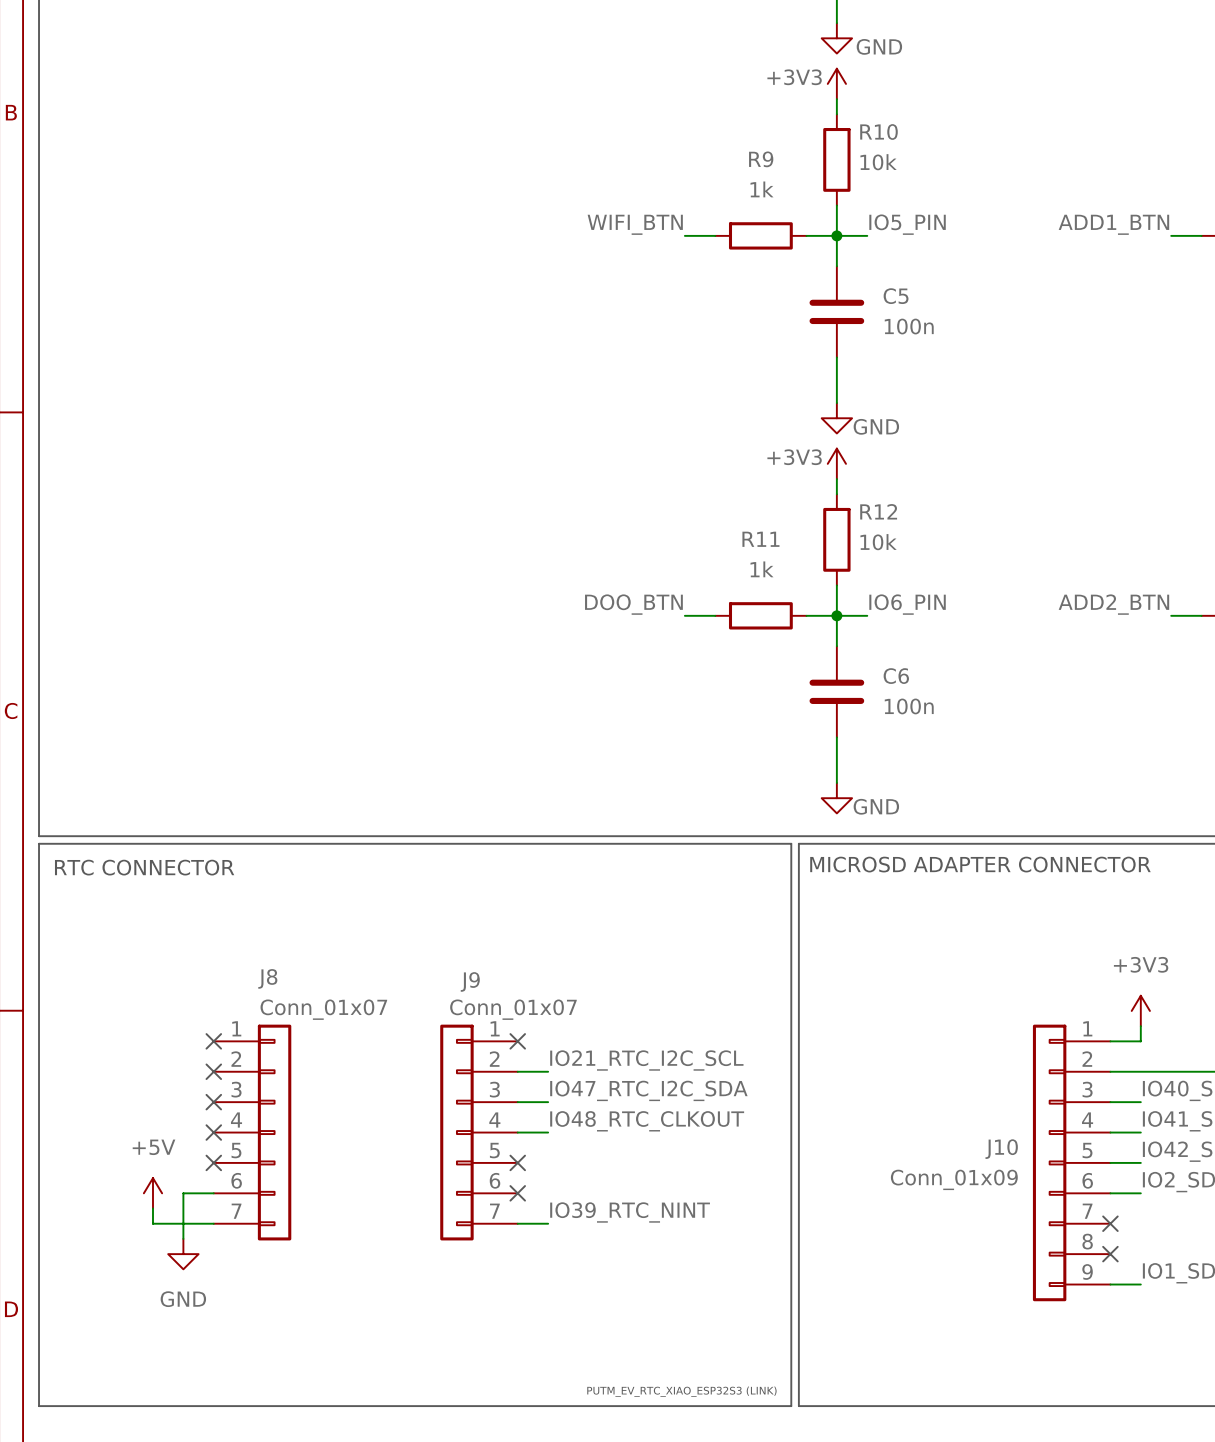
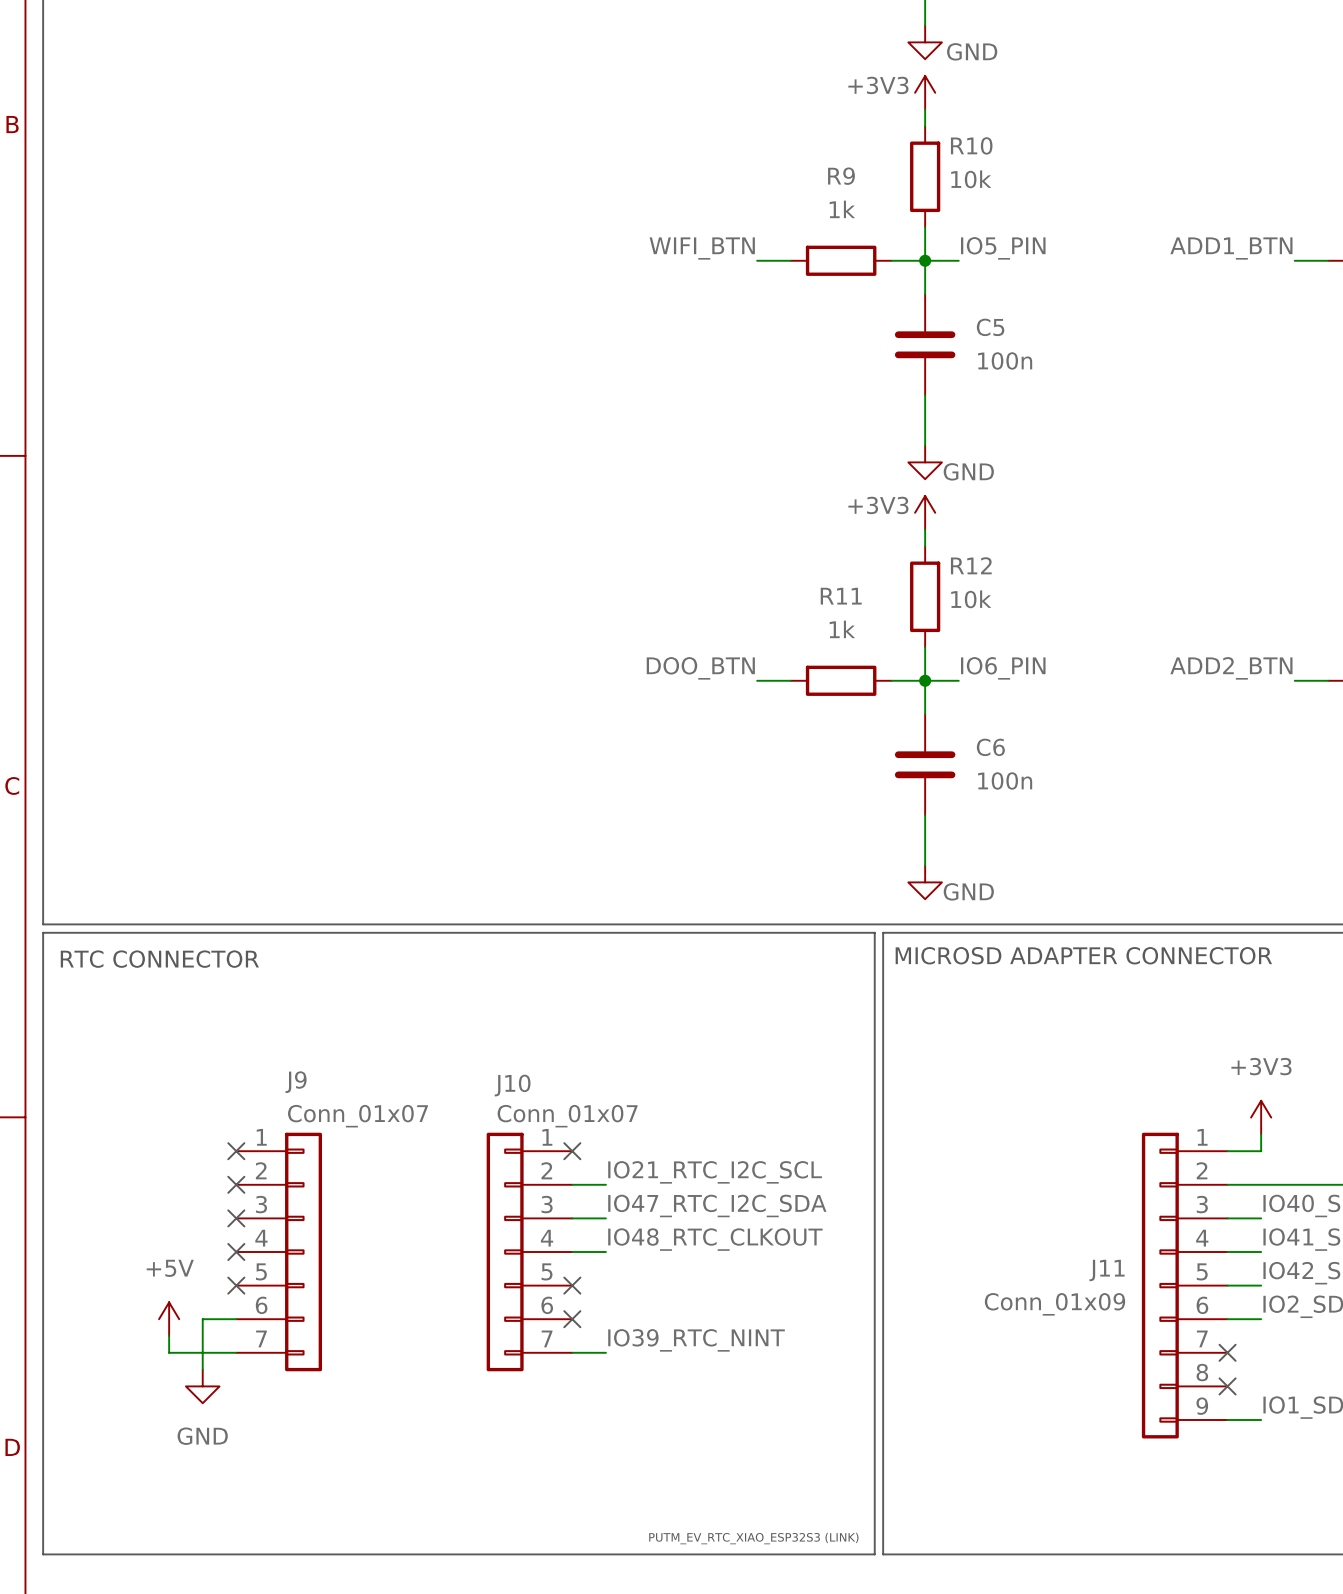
J8 name: J8 (267, 978) -> J9 (296, 1082)
J9 name: J9 (470, 981) -> J10 (512, 1085)
J10 name: J10 (1001, 1149) -> J11 (1107, 1270)

